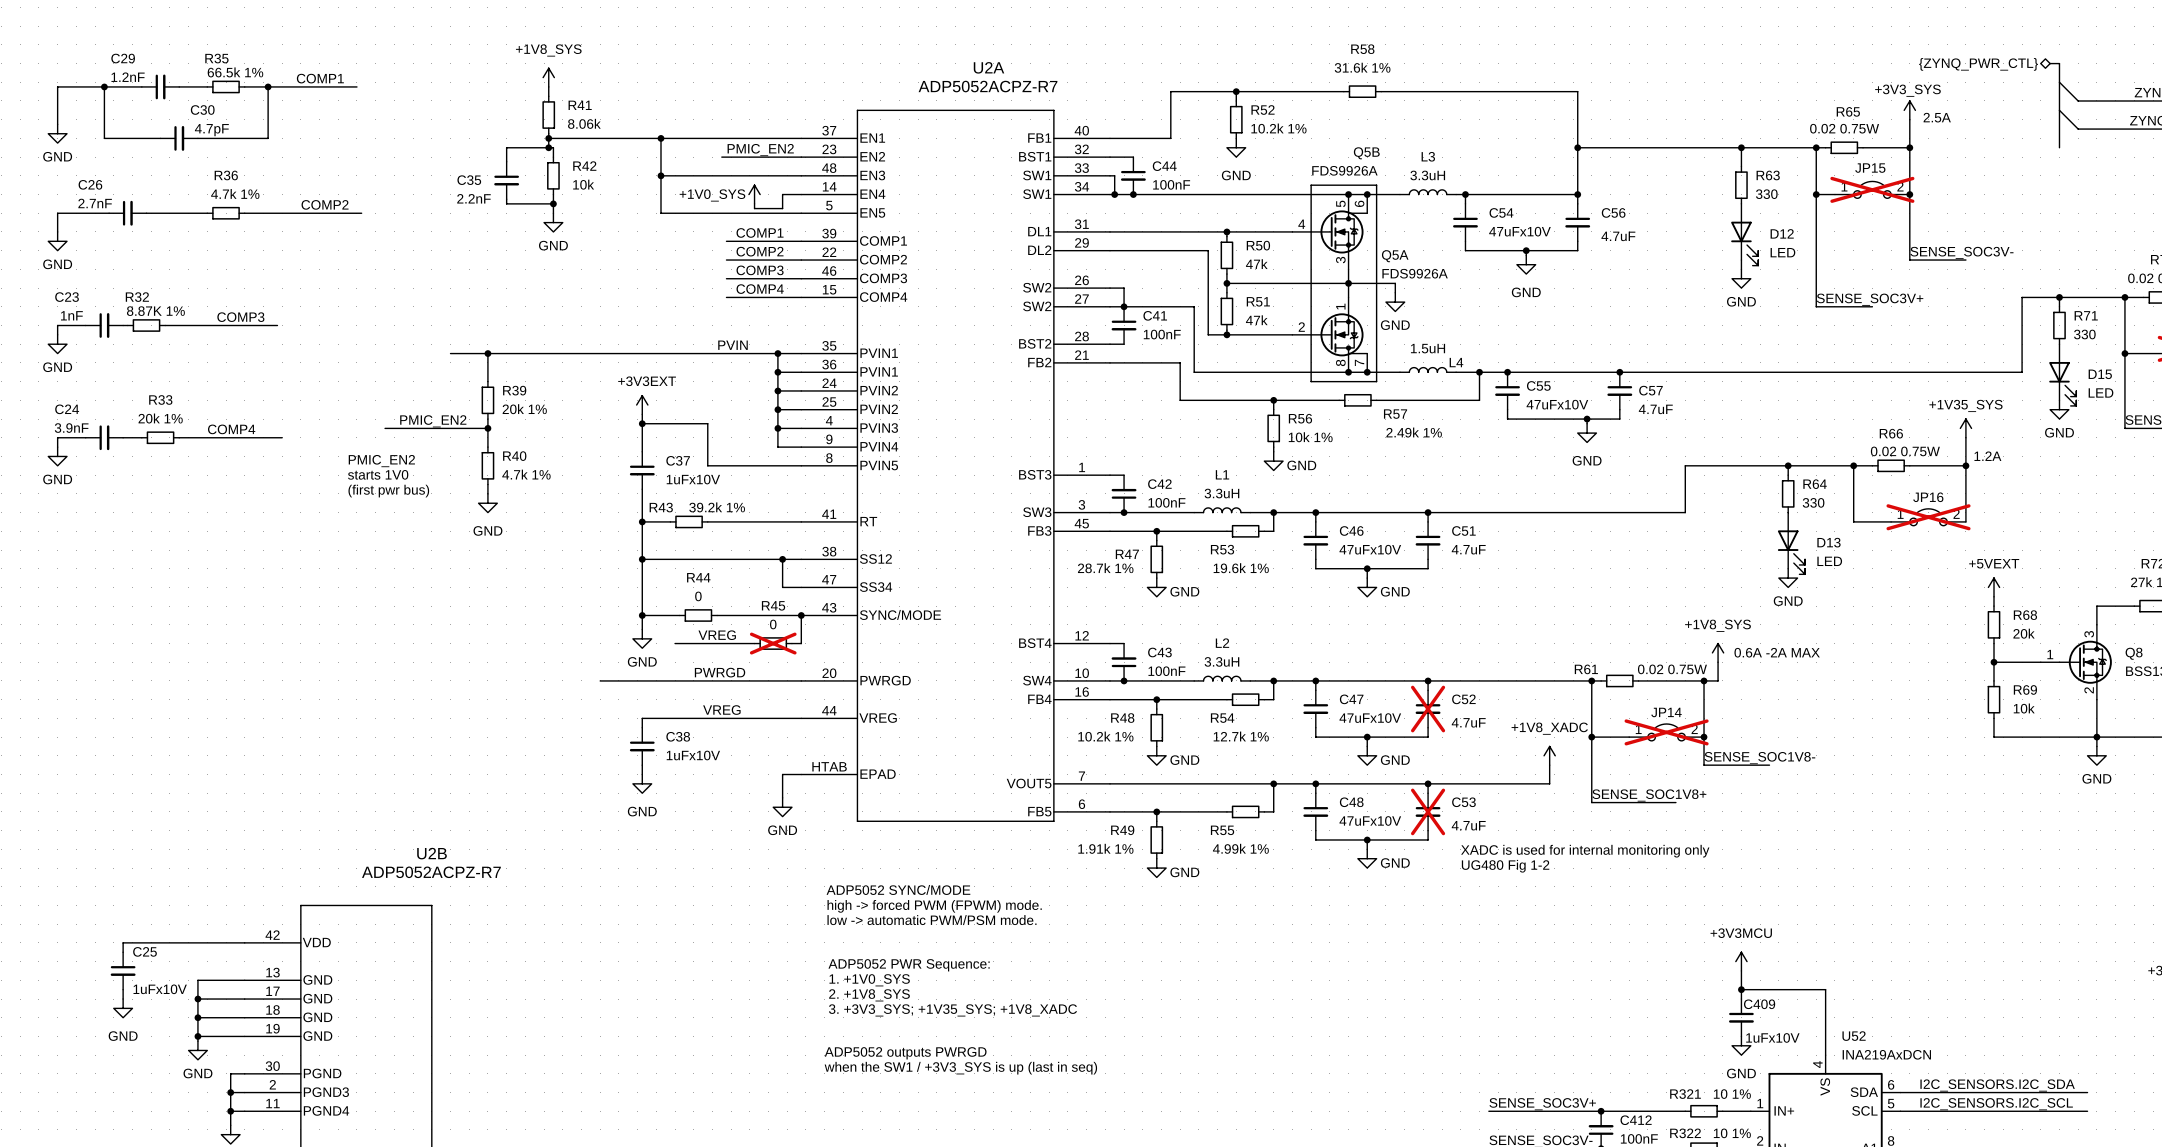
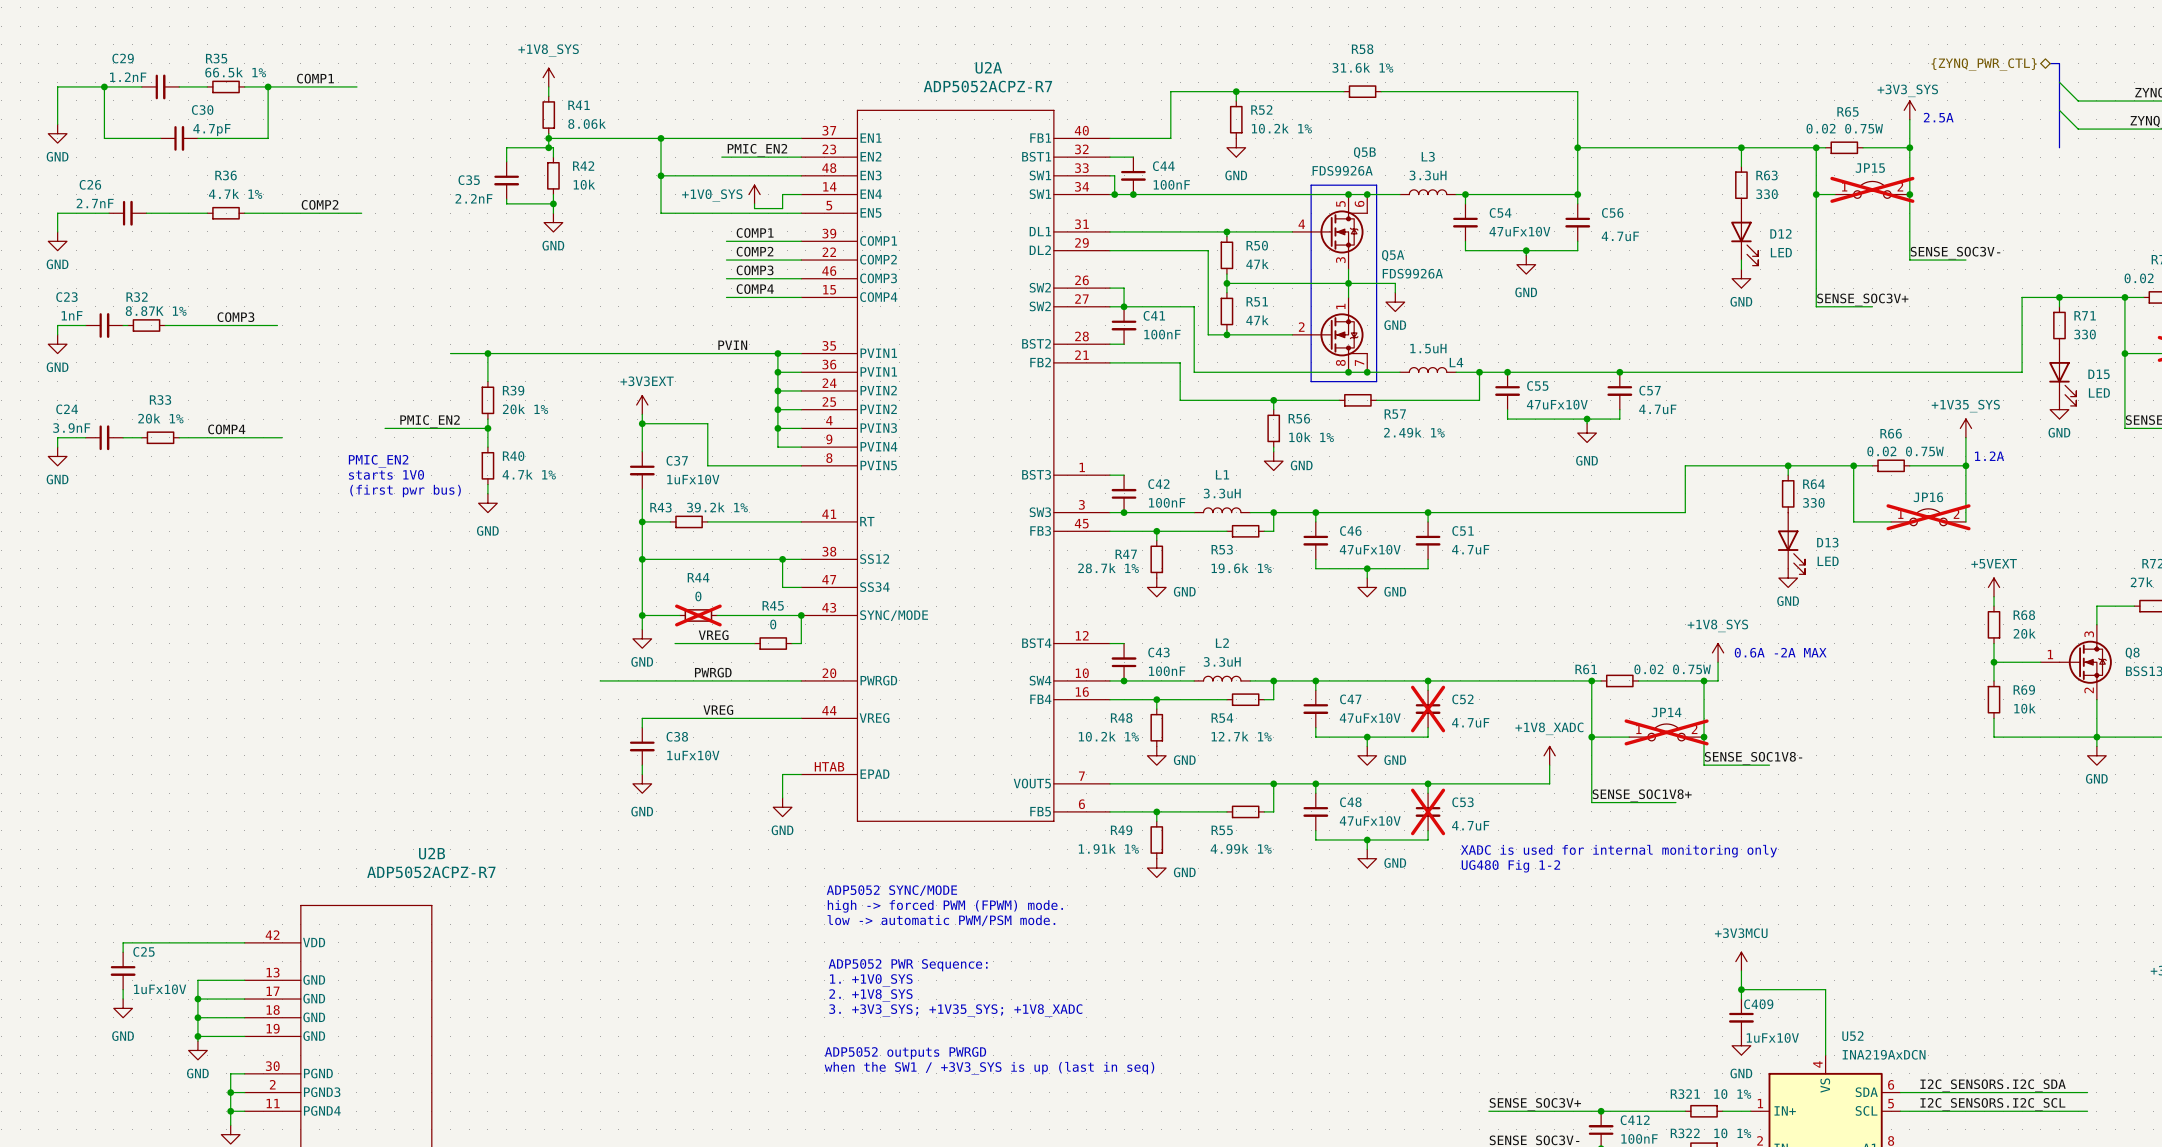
R44 do-not-place cross: none -> (698, 615)
R45 do-not-place cross: (773, 643) -> none

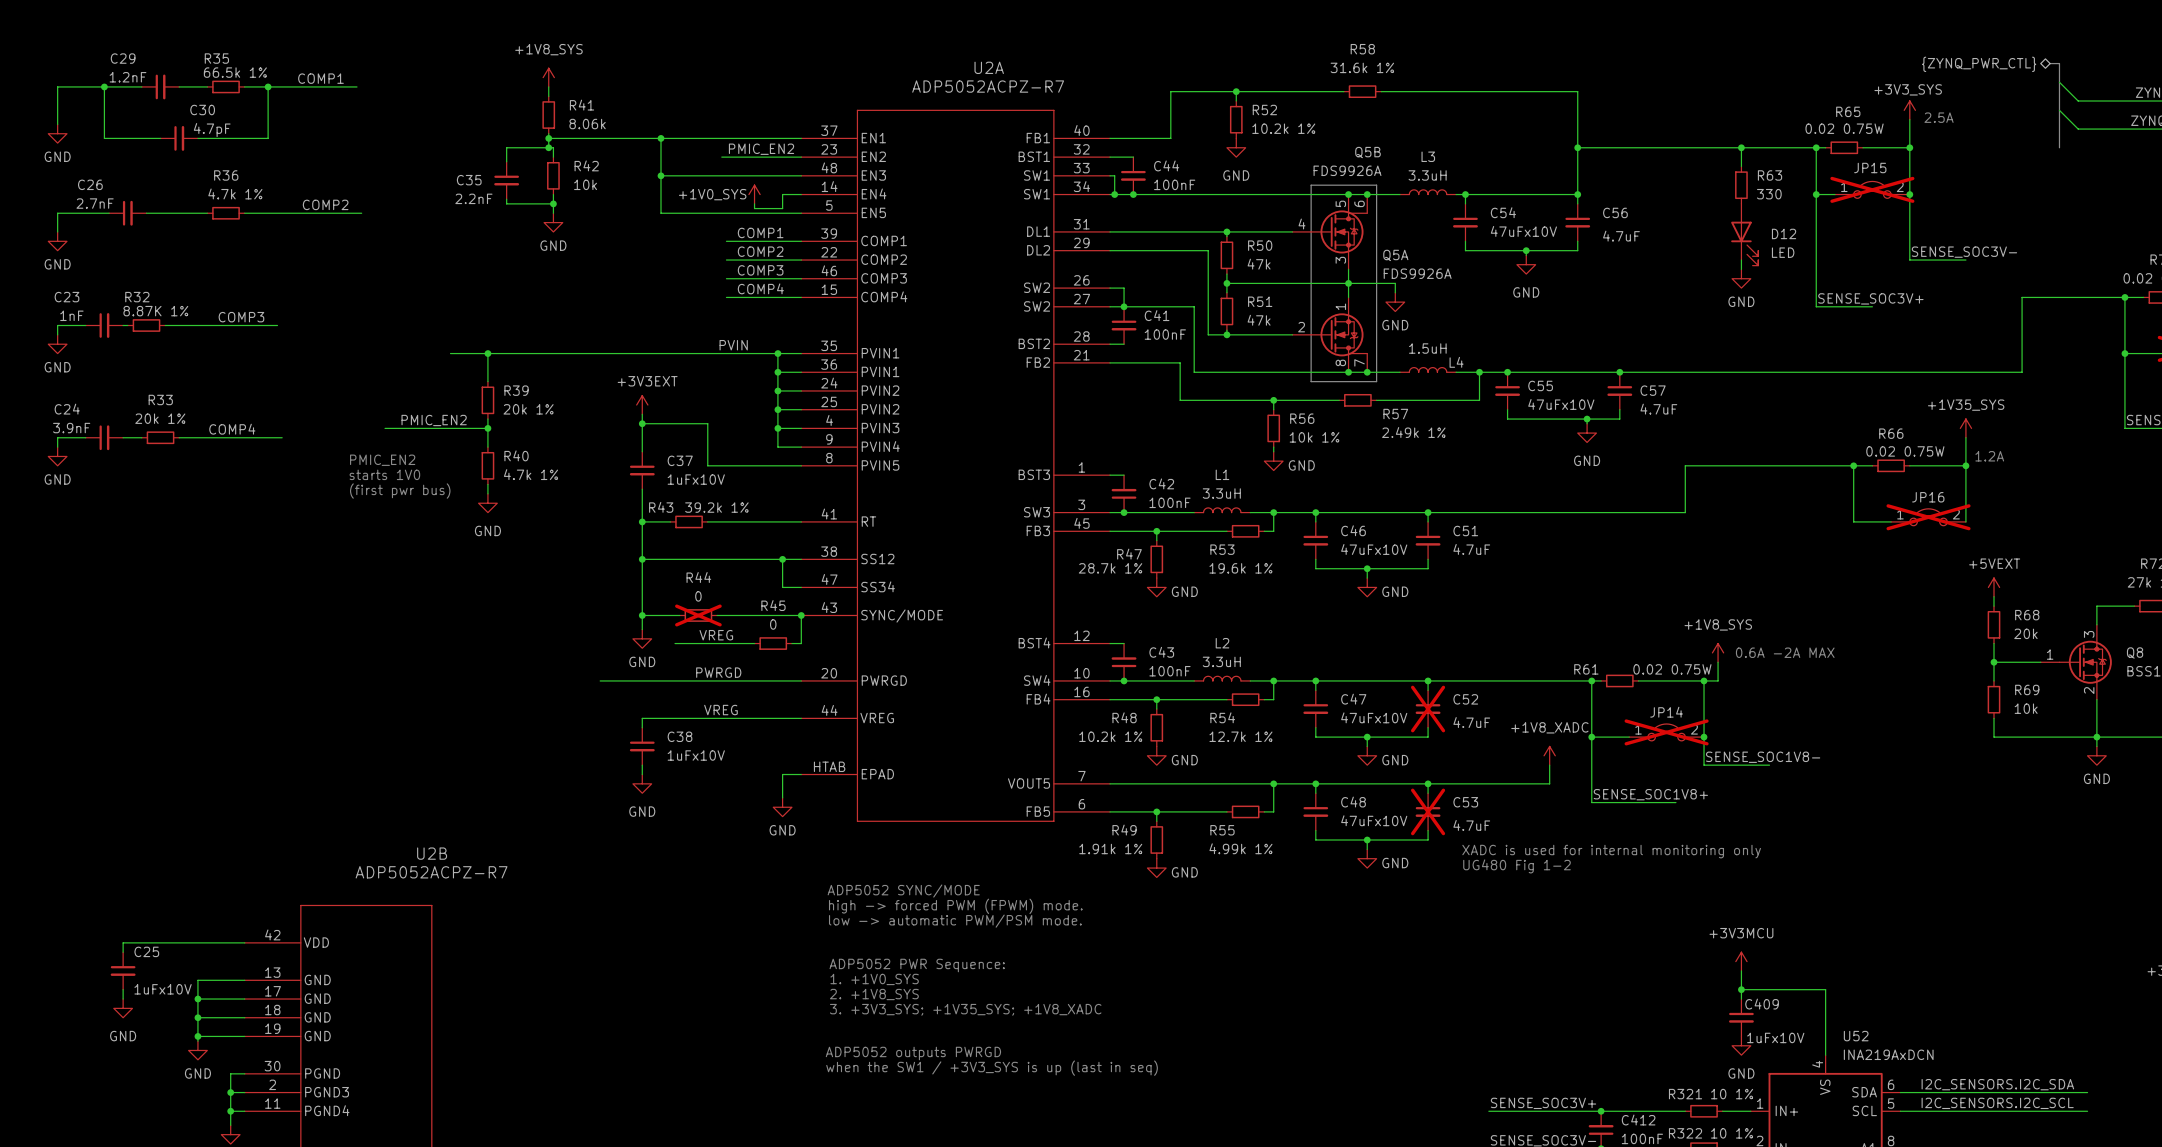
wire: (2059, 297) (2059, 306) -> none
junction: (2059, 297) -> none
R71: 330 (2059, 325) -> none
D15: LED (2062, 375) -> none
power symbol: GND (2059, 409) -> none
wire: (1788, 465) (1788, 475) -> none
junction: (1788, 465) -> none
R64: 330 (1788, 493) -> none
D13: LED (1791, 543) -> none
power symbol: GND (1788, 578) -> none

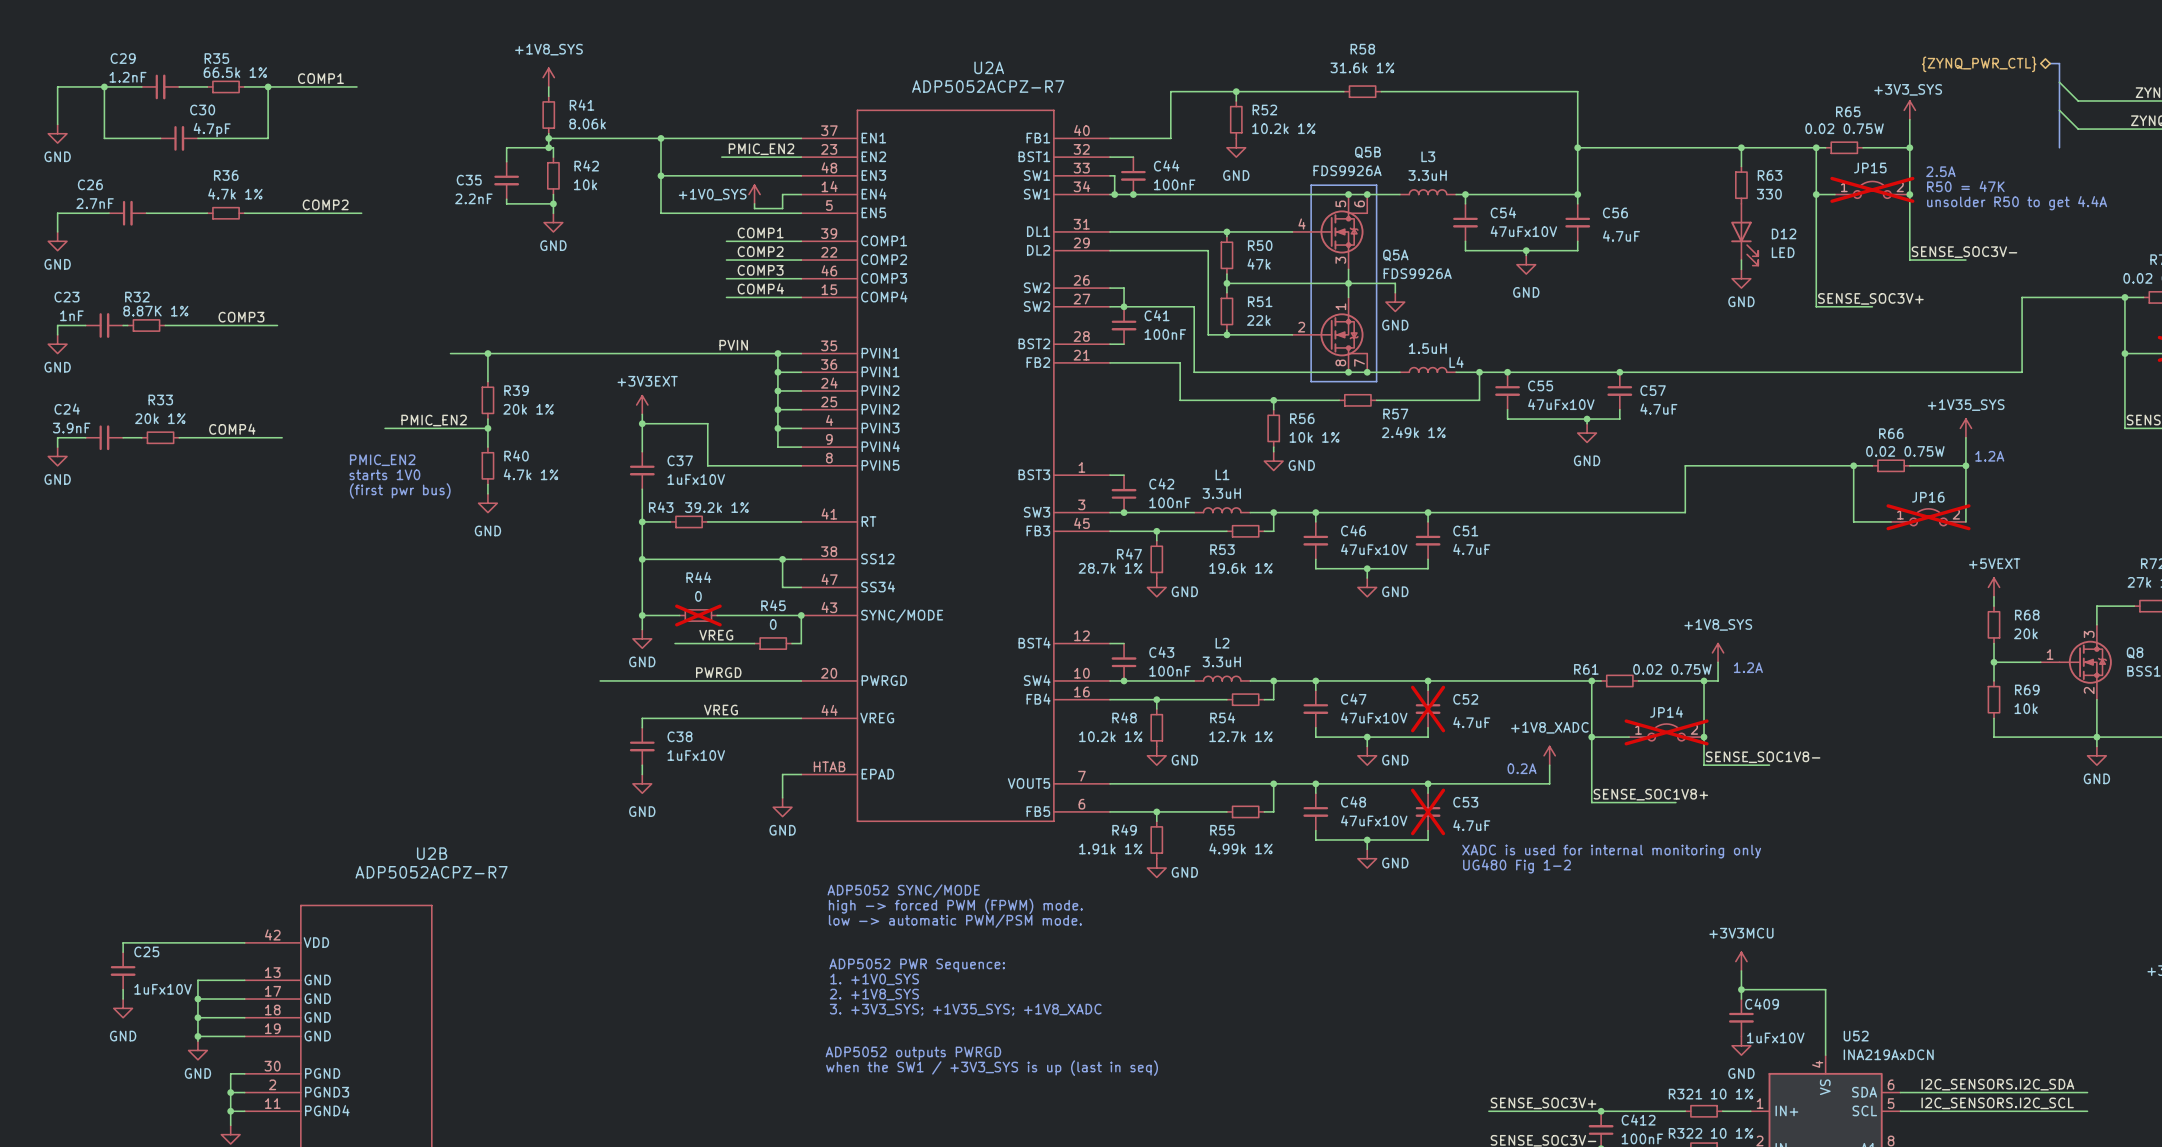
text position: 2.5A (1939, 117) -> 2.5A (1940, 171)
text: none -> R50 = 47K (1965, 186)
text: none -> unsolder R50 to get 4.4A (2017, 203)
R51 value: 47k (1259, 320) -> 22k (1258, 320)
text: 0.6A -2A MAX (1785, 652) -> none
text: none -> 1.2A (1748, 667)
text: none -> 0.2A (1522, 768)

